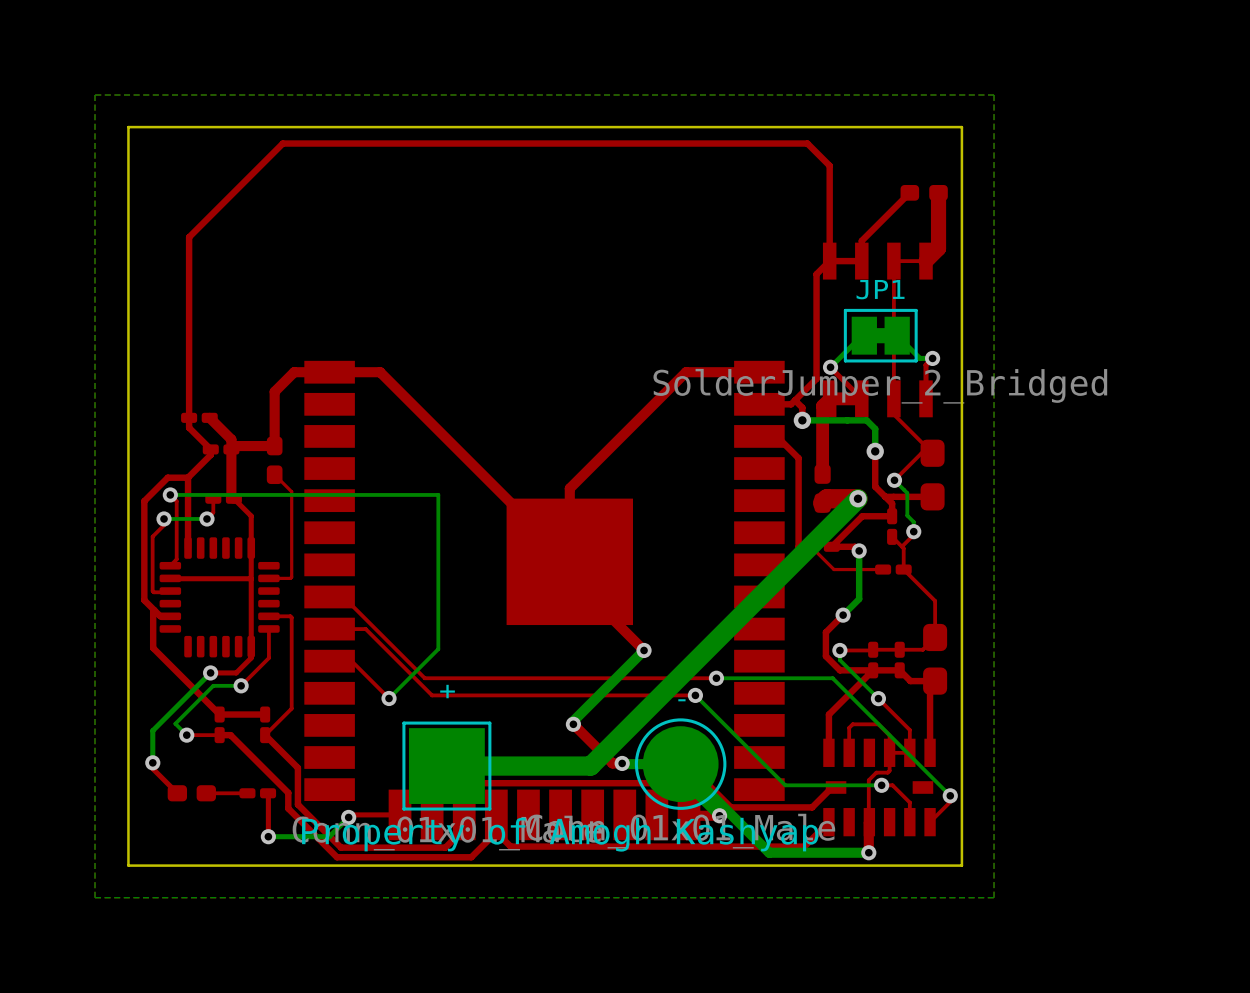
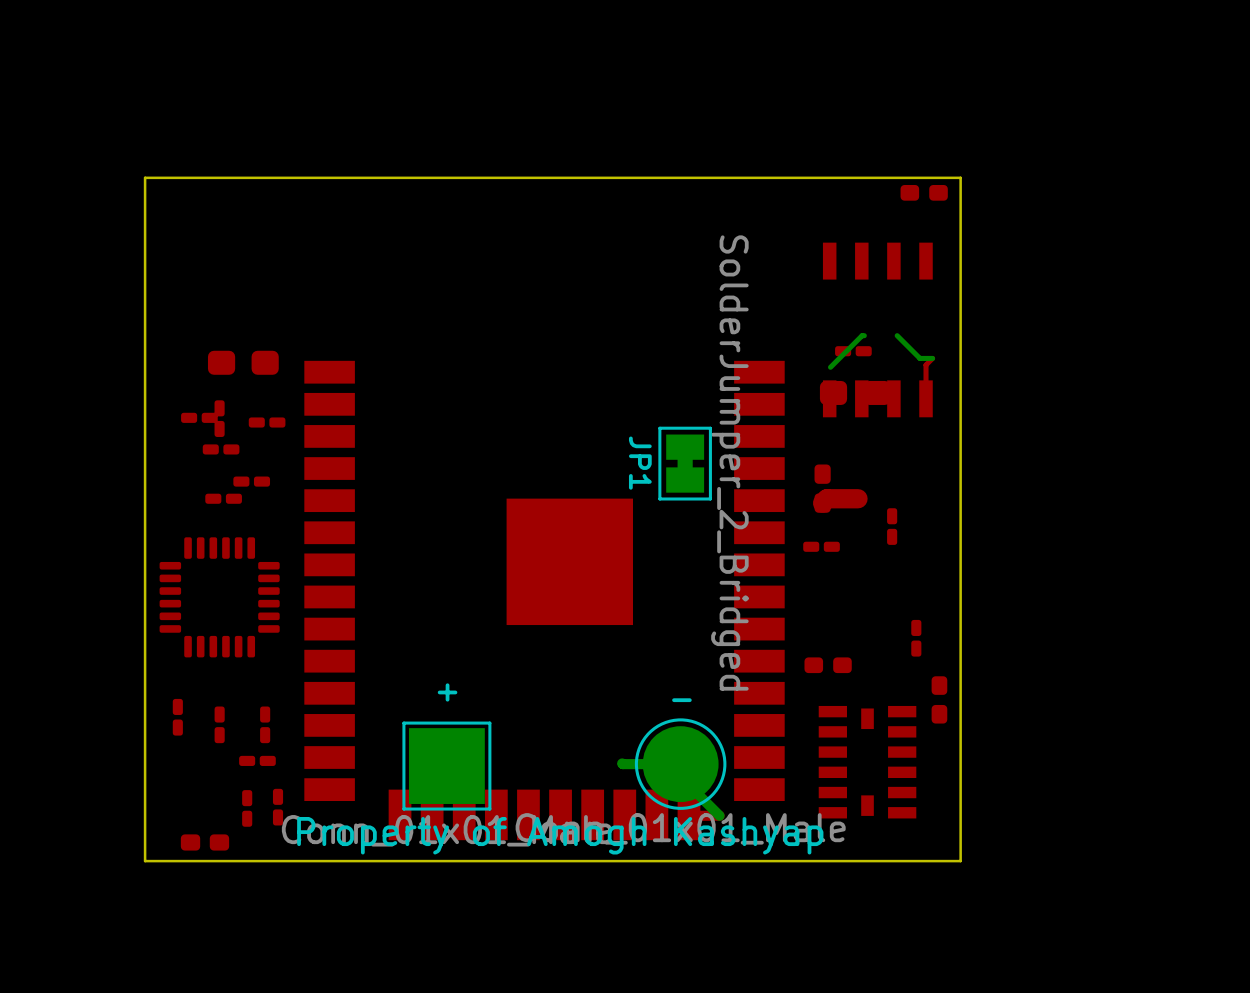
bottom zone outline: (994, 95) (994, 897) (95, 897) (95, 95) (994, 95) -> none
board edge: (961, 127) (128, 127) (128, 865) (961, 865) (961, 127) -> (960, 177) (960, 861) (145, 861) (145, 177) (960, 177)
top track: (909, 192) (861, 240) (861, 261) (829, 261) -> none
top track: (938, 192) (938, 248) (926, 261) (893, 261) (893, 414) (932, 453) (921, 453) (894, 480) -> none
top track: (829, 261) (829, 165) (807, 143) (282, 143) (189, 237) (189, 427) (210, 449) (210, 454) (188, 477) -> none
top track: (829, 261) (816, 274) (816, 378) (791, 404) (759, 404) -> none
JP1 name position: JP1 (880, 289) -> JP1 (640, 463)
JP1 rotation: 0° (880, 335) -> 90° clockwise (685, 463)
JP1 position: (880, 335) -> (685, 463)
part: none -> (853, 351)
via: (932, 358) -> none
part: none -> (243, 362)
top track: (830, 367) (861, 398) (829, 398) (822, 405) (822, 474) -> none
via: (830, 367) -> none
top track: (759, 372) (686, 372) (569, 488) (569, 576) (644, 650) -> none
JP1 value position: SolderJumper_2_Bridged (880, 386) -> SolderJumper_2_Bridged (729, 462)
top track: (795, 400) (802, 407) (802, 420) -> none
top track: (209, 417) (231, 439) (231, 496) (251, 516) (251, 657) (236, 672) (210, 672) -> none
part: none -> (219, 418)
bottom track: (802, 420) (866, 420) (875, 428) (875, 451) -> none
via: (802, 420) -> none
part: none -> (267, 422)
top track: (759, 436) (776, 436) (798, 458) (798, 546) (811, 546) (833, 569) (883, 569) -> none
top track: (231, 449) (234, 446) (274, 446) (274, 391) (294, 372) (380, 372) (569, 561) -> none
top track: (875, 451) (875, 486) (892, 503) (892, 516) (862, 516) (831, 546) (855, 546) (859, 550) -> none
via: (875, 451) -> none
part: (274, 460) -> none
top track: (274, 474) (291, 491) (291, 577) (268, 578) -> none
part rotation: 0° (932, 475) -> 90° clockwise (855, 392)
part position: (932, 475) -> (855, 392)
top track: (188, 477) (188, 548) -> none
top track: (188, 477) (167, 477) (144, 501) (144, 600) (160, 616) (170, 616) -> none
bottom track: (894, 480) (907, 493) (907, 515) (913, 522) (913, 531) -> none
via: (894, 480) -> none
part: none -> (251, 481)
top track: (170, 494) (176, 501) (176, 559) (170, 565) -> none
bottom track: (170, 494) (438, 494) (438, 649) (389, 698) -> none
via: (170, 494) -> none
top track: (932, 496) (885, 496) -> none
top track: (213, 498) (213, 512) (207, 518) -> none
bottom track: (858, 498) (590, 766) (446, 766) -> none
via: (858, 498) -> none
top track: (164, 518) (164, 525) (152, 536) (152, 591) (170, 591) -> none
via: (164, 518) -> none
bottom track: (207, 518) (164, 518) -> none
via: (207, 518) -> none
top track: (913, 531) (913, 534) (901, 546) -> none
via: (913, 531) -> none
top track: (892, 536) (903, 548) (903, 569) (935, 600) (935, 637) (922, 649) (839, 650) -> none
bottom track: (859, 550) (859, 599) (843, 615) -> none
via: (859, 550) -> none
part: (893, 569) -> none
top track: (251, 578) (170, 578) -> none
top track: (329, 596) (343, 596) (424, 678) (716, 678) -> none
top track: (154, 610) (153, 648) (219, 714) (265, 714) -> none
top track: (843, 615) (825, 632) (825, 656) (840, 670) (899, 670) (910, 681) (935, 681) (930, 686) (930, 752) -> none
via: (843, 615) -> none
top track: (268, 616) (291, 617) (291, 708) (265, 735) (297, 767) (297, 804) (340, 847) (445, 847) (464, 828) (464, 790) (471, 783) (706, 783) (730, 807) (812, 807) (832, 787) (836, 787) -> none
top track: (268, 628) (268, 658) (241, 685) -> none
top track: (329, 629) (365, 629) (432, 695) (695, 695) -> none
part: none -> (916, 638)
bottom track: (644, 650) (573, 721) (573, 724) -> none
via: (644, 650) -> none
bottom track: (839, 650) (839, 660) (878, 698) -> none
via: (839, 650) -> none
part: (935, 659) -> none
part: (873, 660) -> none
part: (899, 660) -> none
top track: (329, 661) (351, 661) (389, 698) -> none
part: none -> (828, 665)
top track: (873, 670) (828, 714) (828, 752) -> none
bottom track: (210, 672) (152, 730) (152, 762) -> none
via: (210, 672) -> none
bottom track: (716, 678) (832, 678) (950, 795) -> none
via: (716, 678) -> none
bottom track: (241, 685) (213, 685) (175, 723) (186, 735) -> none
via: (241, 685) -> none
bottom track: (695, 695) (785, 785) (881, 785) -> none
via: (695, 695) -> none
via: (389, 698) -> none
top track: (878, 698) (909, 730) (909, 752) (889, 752) -> none
via: (878, 698) -> none
part: none -> (939, 699)
part: none -> (177, 717)
top track: (573, 724) (612, 763) (622, 763) -> none
via: (573, 724) -> none
top track: (186, 735) (230, 735) (288, 792) (288, 808) (337, 857) (471, 857) (496, 832) -> none
via: (186, 735) -> none
top track: (849, 752) (849, 727) (852, 724) (878, 724) (889, 735) (889, 770) (887, 772) (876, 772) (868, 780) (868, 852) -> none
part: none -> (257, 760)
top track: (152, 762) (152, 768) (177, 793) -> none
via: (152, 762) -> none
via: (622, 763) -> none
bottom track: (680, 764) (769, 852) (868, 852) -> none
top track: (881, 785) (892, 785) (909, 802) (909, 822) -> none
via: (881, 785) -> none
part rotation: 0° (879, 787) -> 90° clockwise (867, 762)
part position: (191, 793) -> (204, 842)
top track: (247, 793) (206, 793) -> none
part: (257, 793) -> none
top track: (268, 793) (268, 836) -> none
top track: (950, 795) (950, 801) (930, 822) -> none
via: (950, 795) -> none
part: none -> (278, 807)
part: none -> (247, 808)
top track: (400, 814) (351, 814) (348, 817) -> none
via: (719, 815) -> none
bottom track: (348, 817) (329, 836) (268, 836) -> none
via: (348, 817) -> none
top track: (828, 822) (804, 846) (510, 846) (496, 832) -> none
via: (268, 836) -> none
via: (868, 852) -> none

